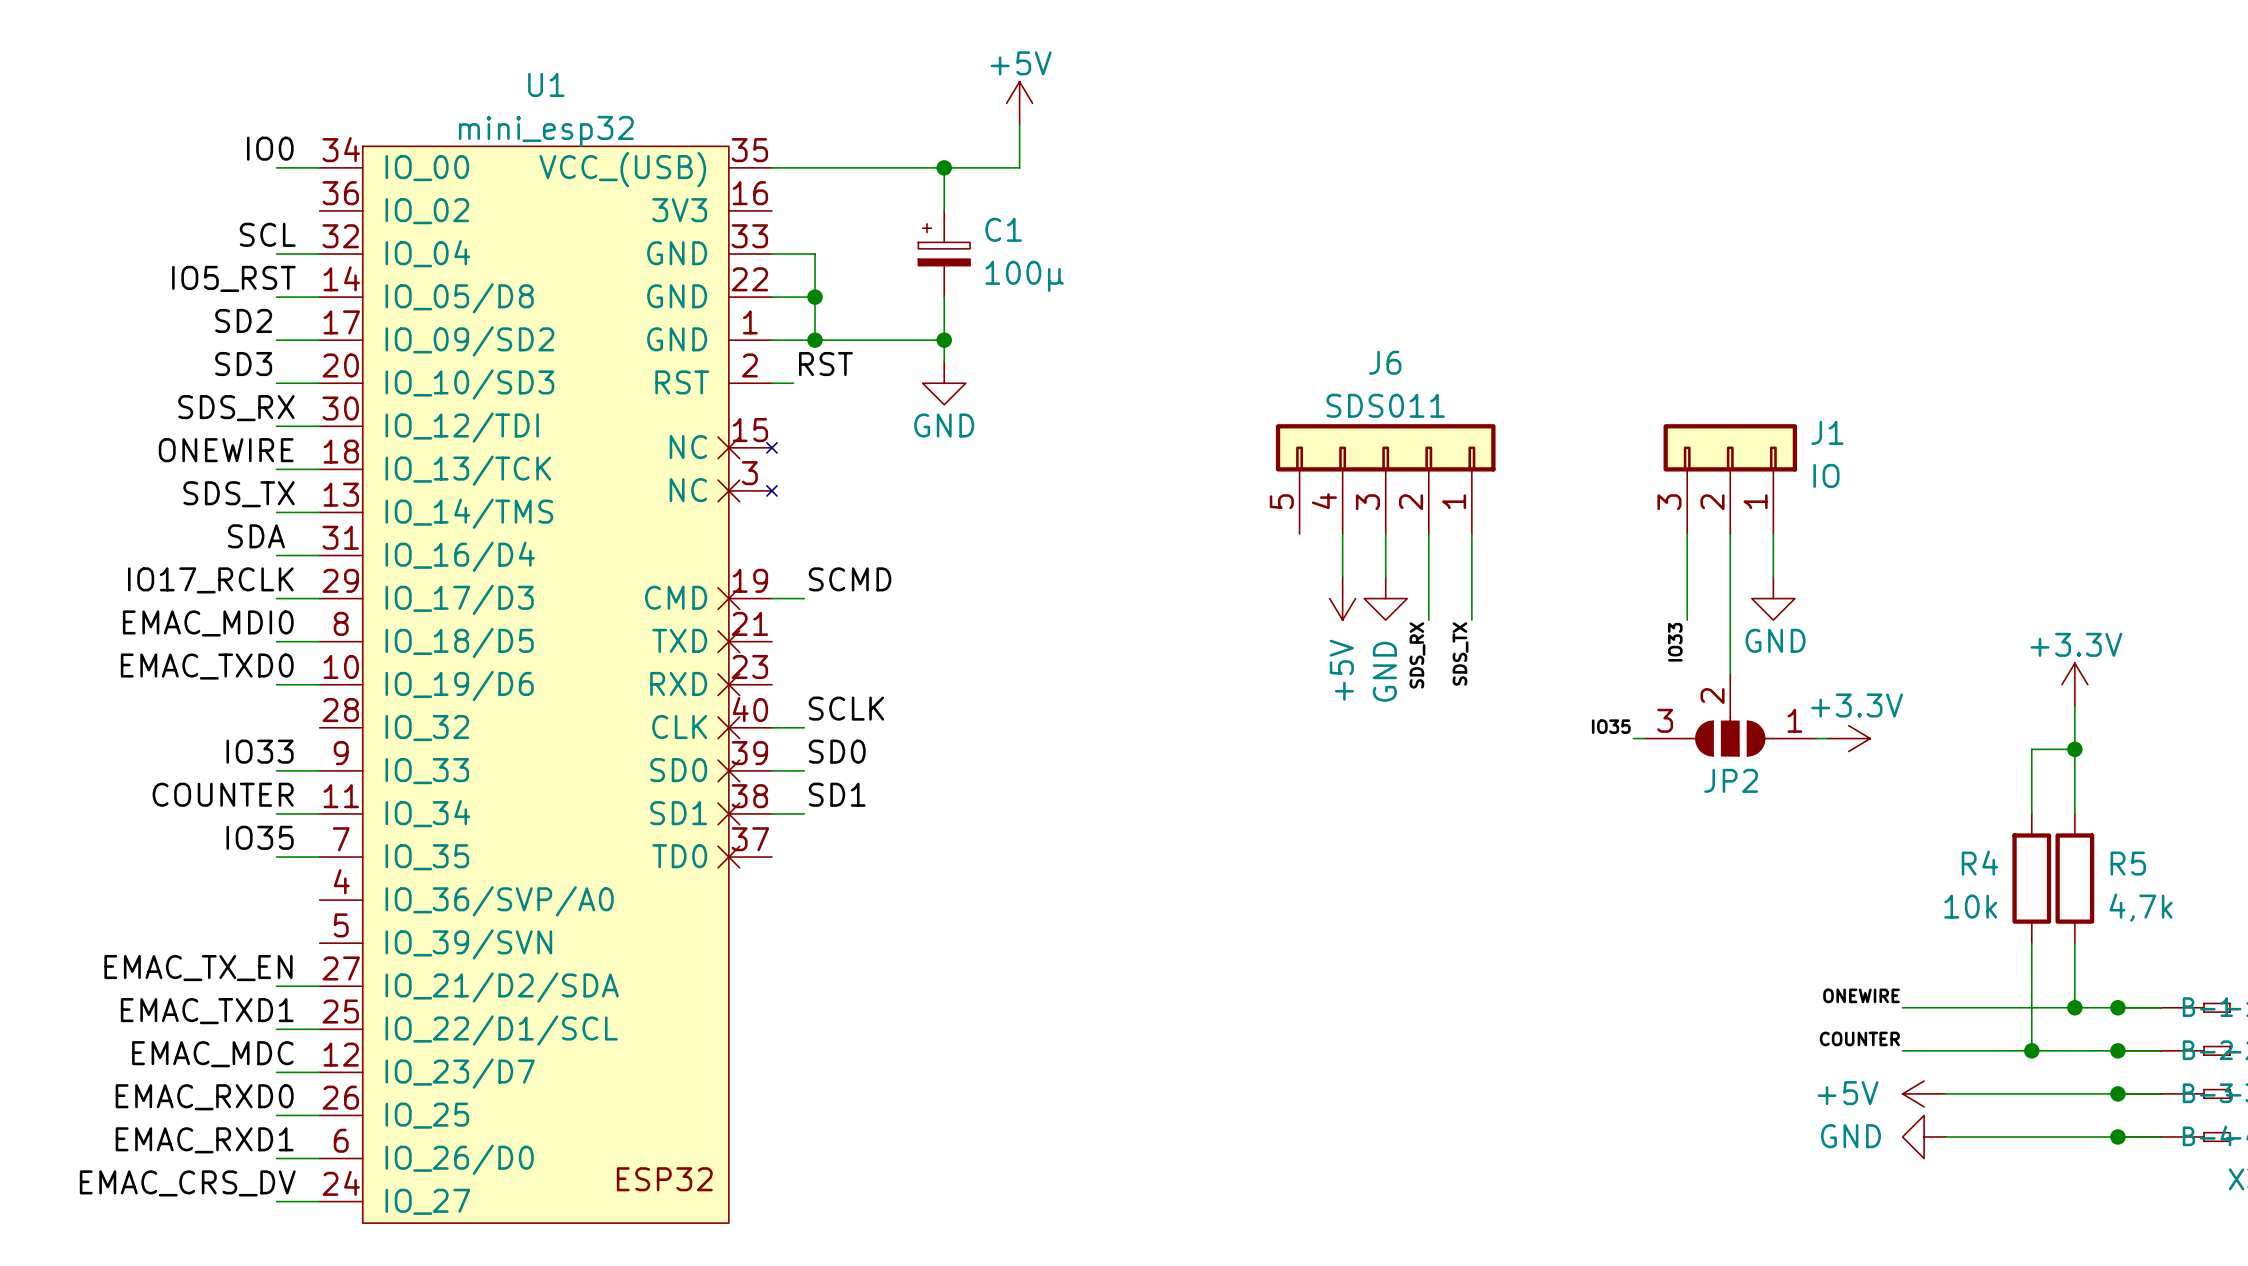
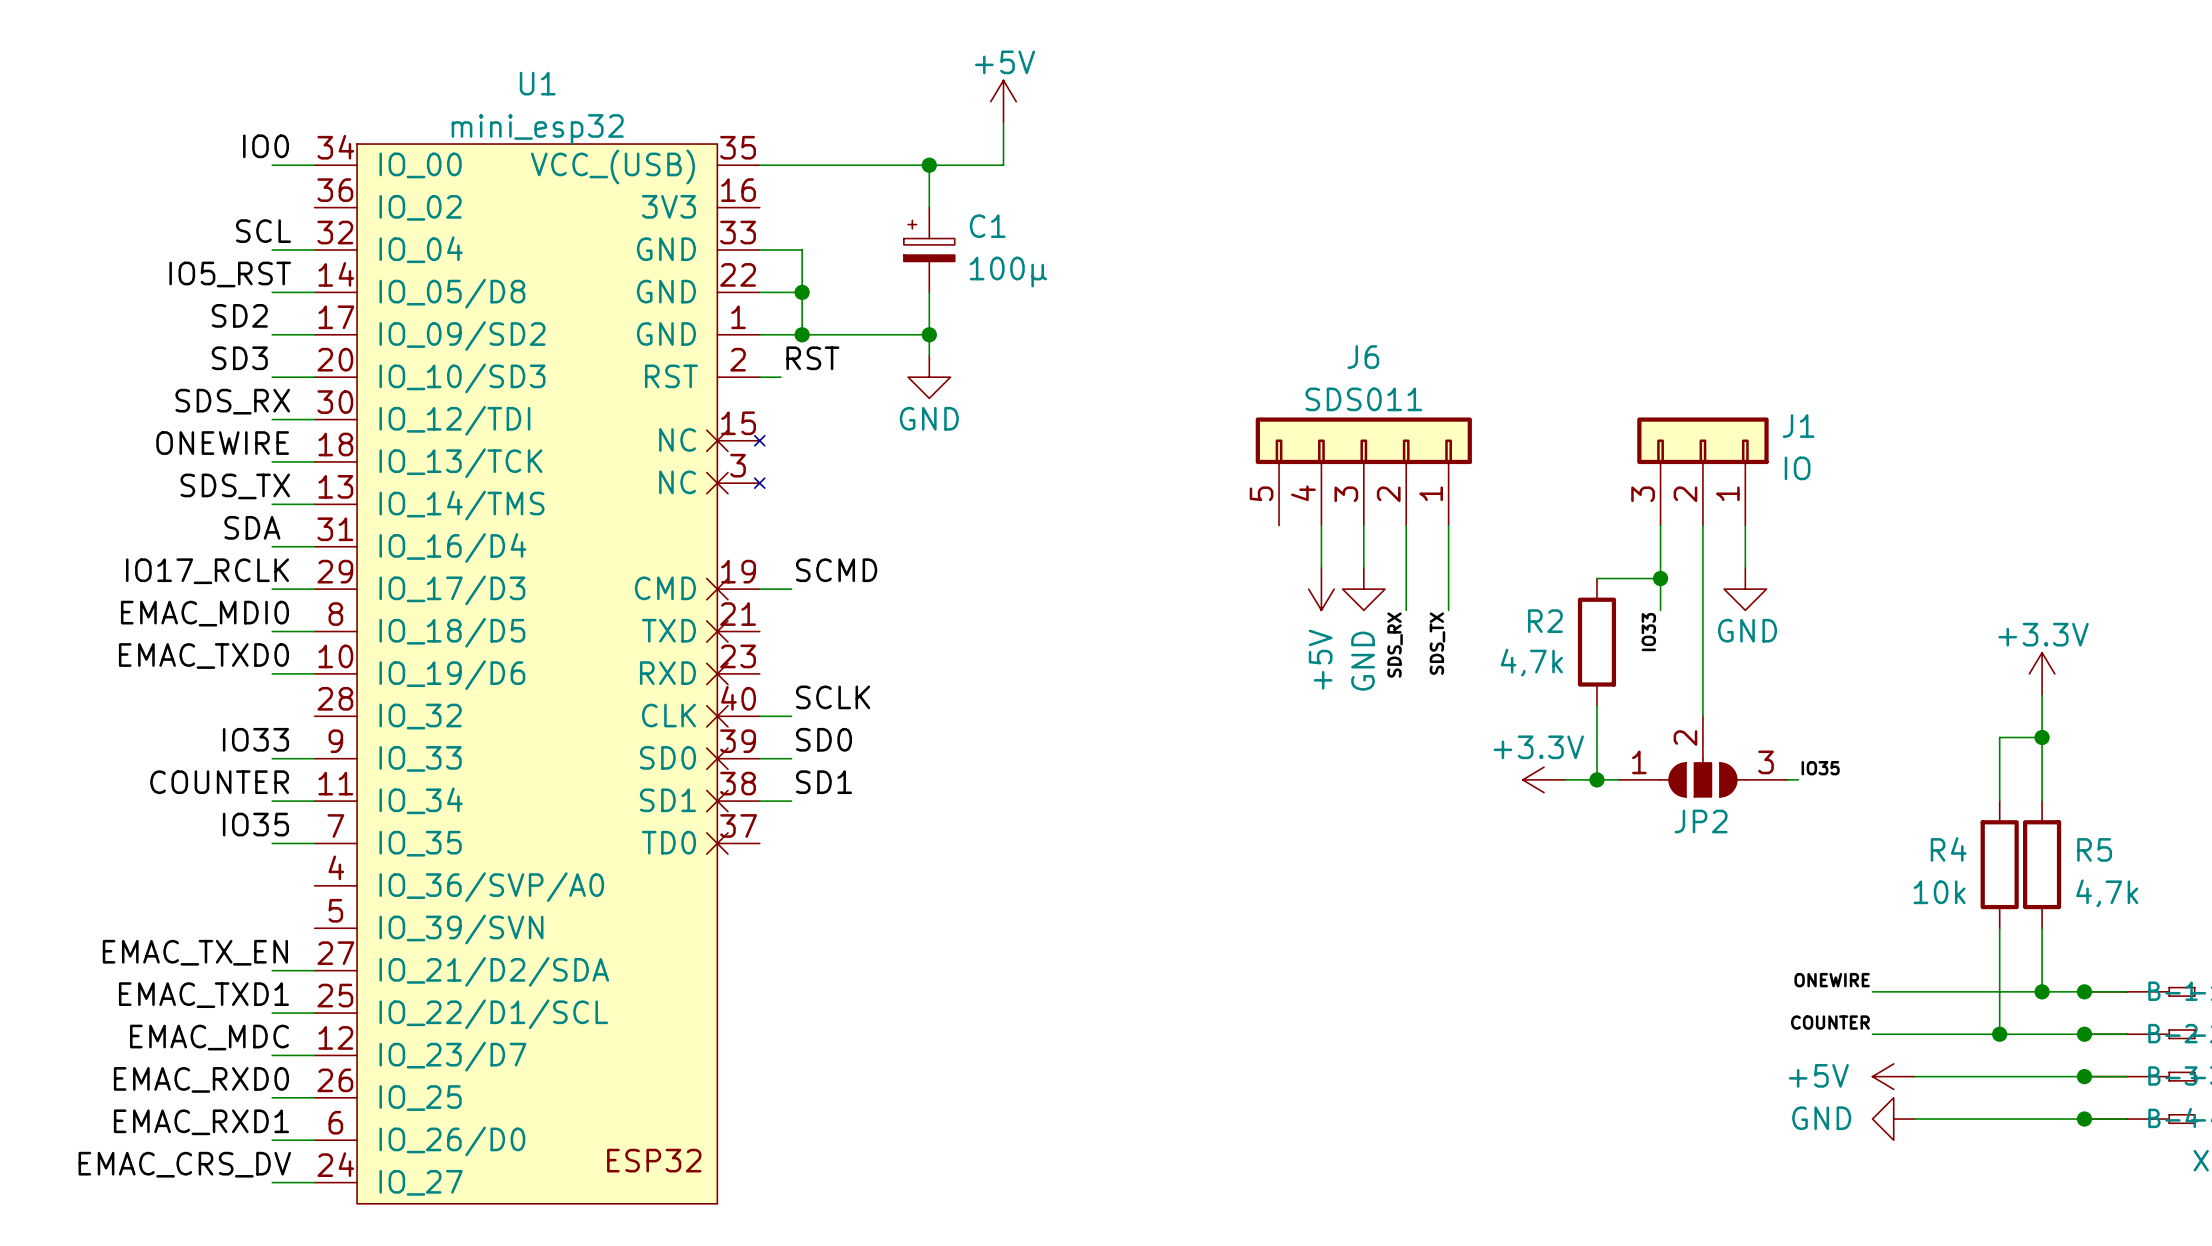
wire: none -> (1596, 578) (1660, 578)
junction: none -> (1660, 578)
R2: none -> 4,7k (1596, 642)
power symbol text position: +3.3V (1857, 705) -> +3.3V (1538, 747)
wire: none -> (1596, 705) (1596, 779)
label position: IO35 (1611, 726) -> IO35 (1820, 768)
JP2 flip: as is (1730, 736) -> left-right (1702, 777)
wire: (1633, 738) (1644, 738) -> none
wire: (1816, 738) (1827, 738) -> (1787, 779) (1798, 779)
power symbol rotation: 0° (1848, 738) -> 180° (1543, 779)
power symbol position: +3.3V (1848, 738) -> +3.3V (1543, 779)
wire: none -> (1565, 779) (1618, 779)
junction: none -> (1596, 779)

